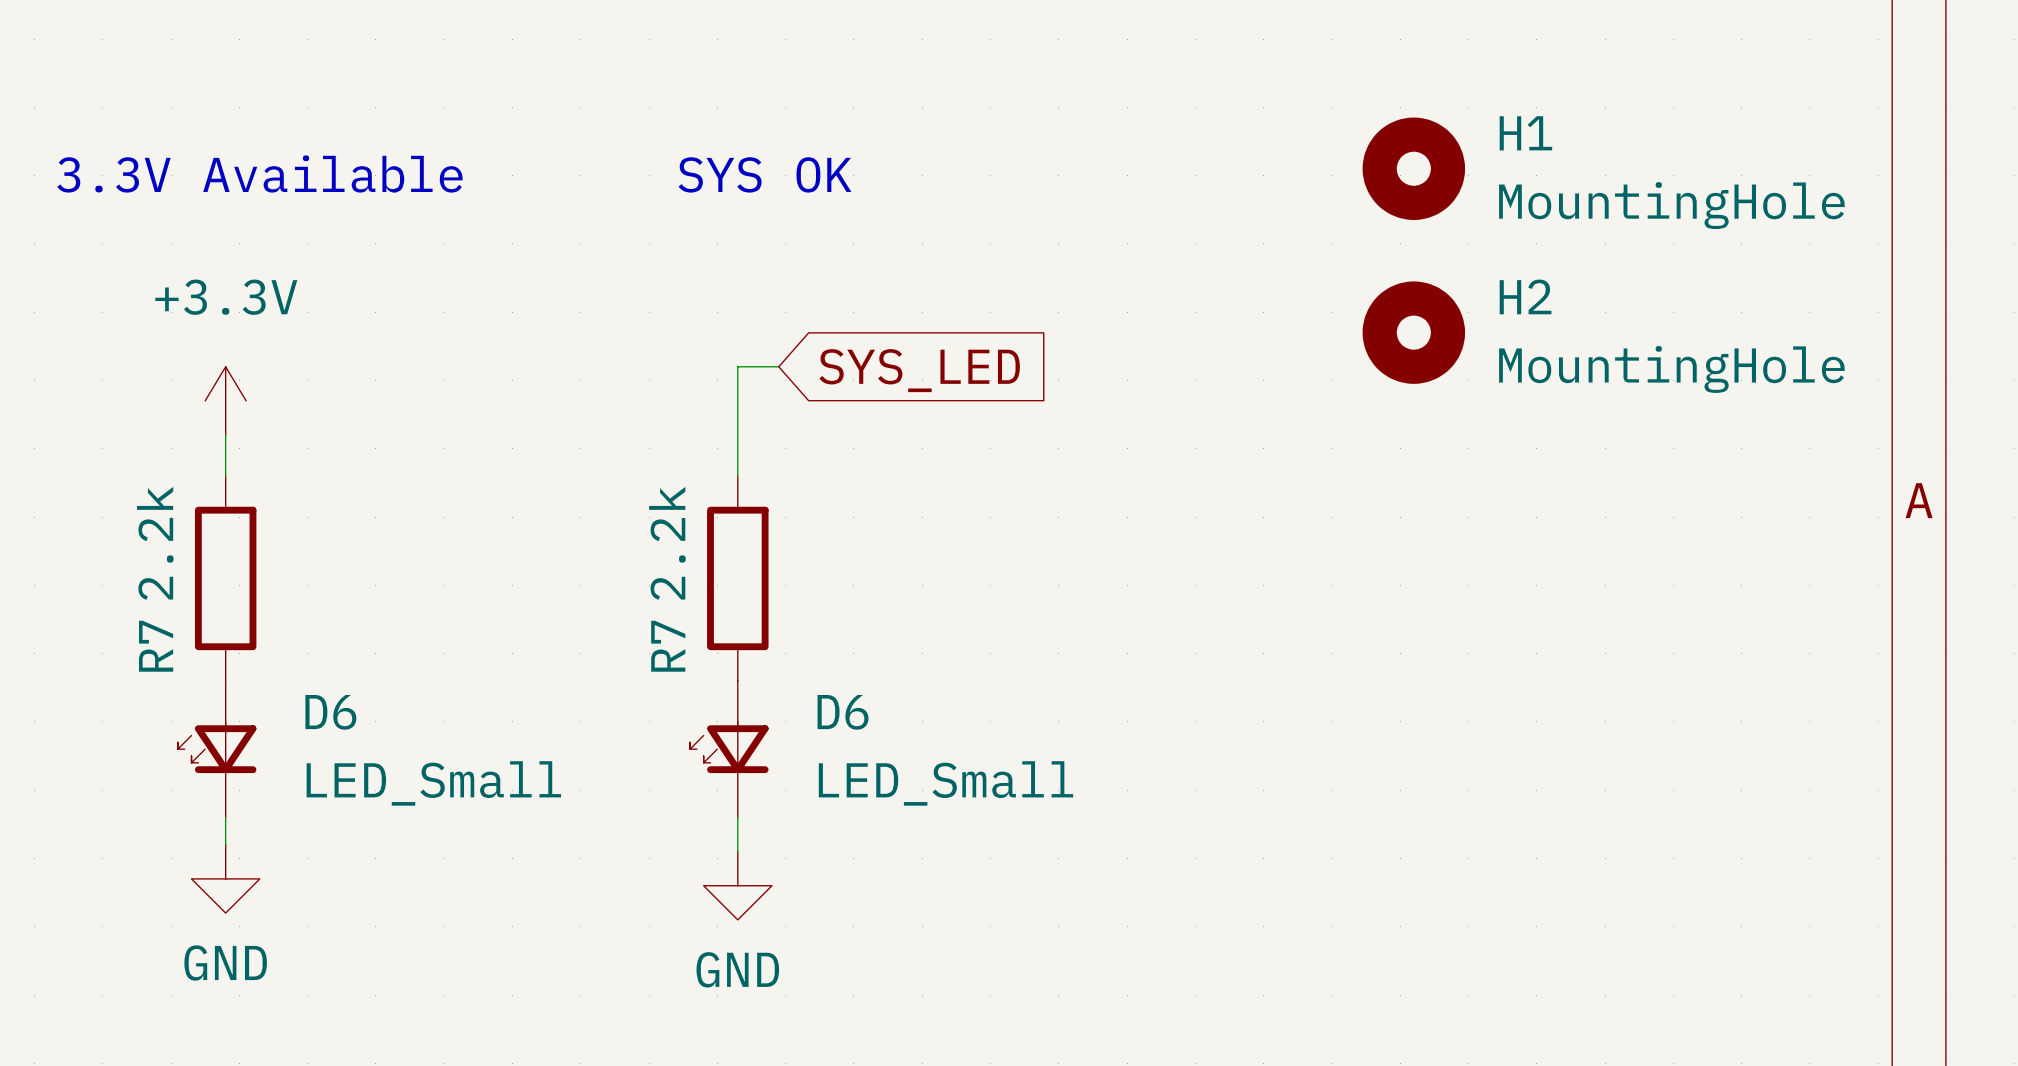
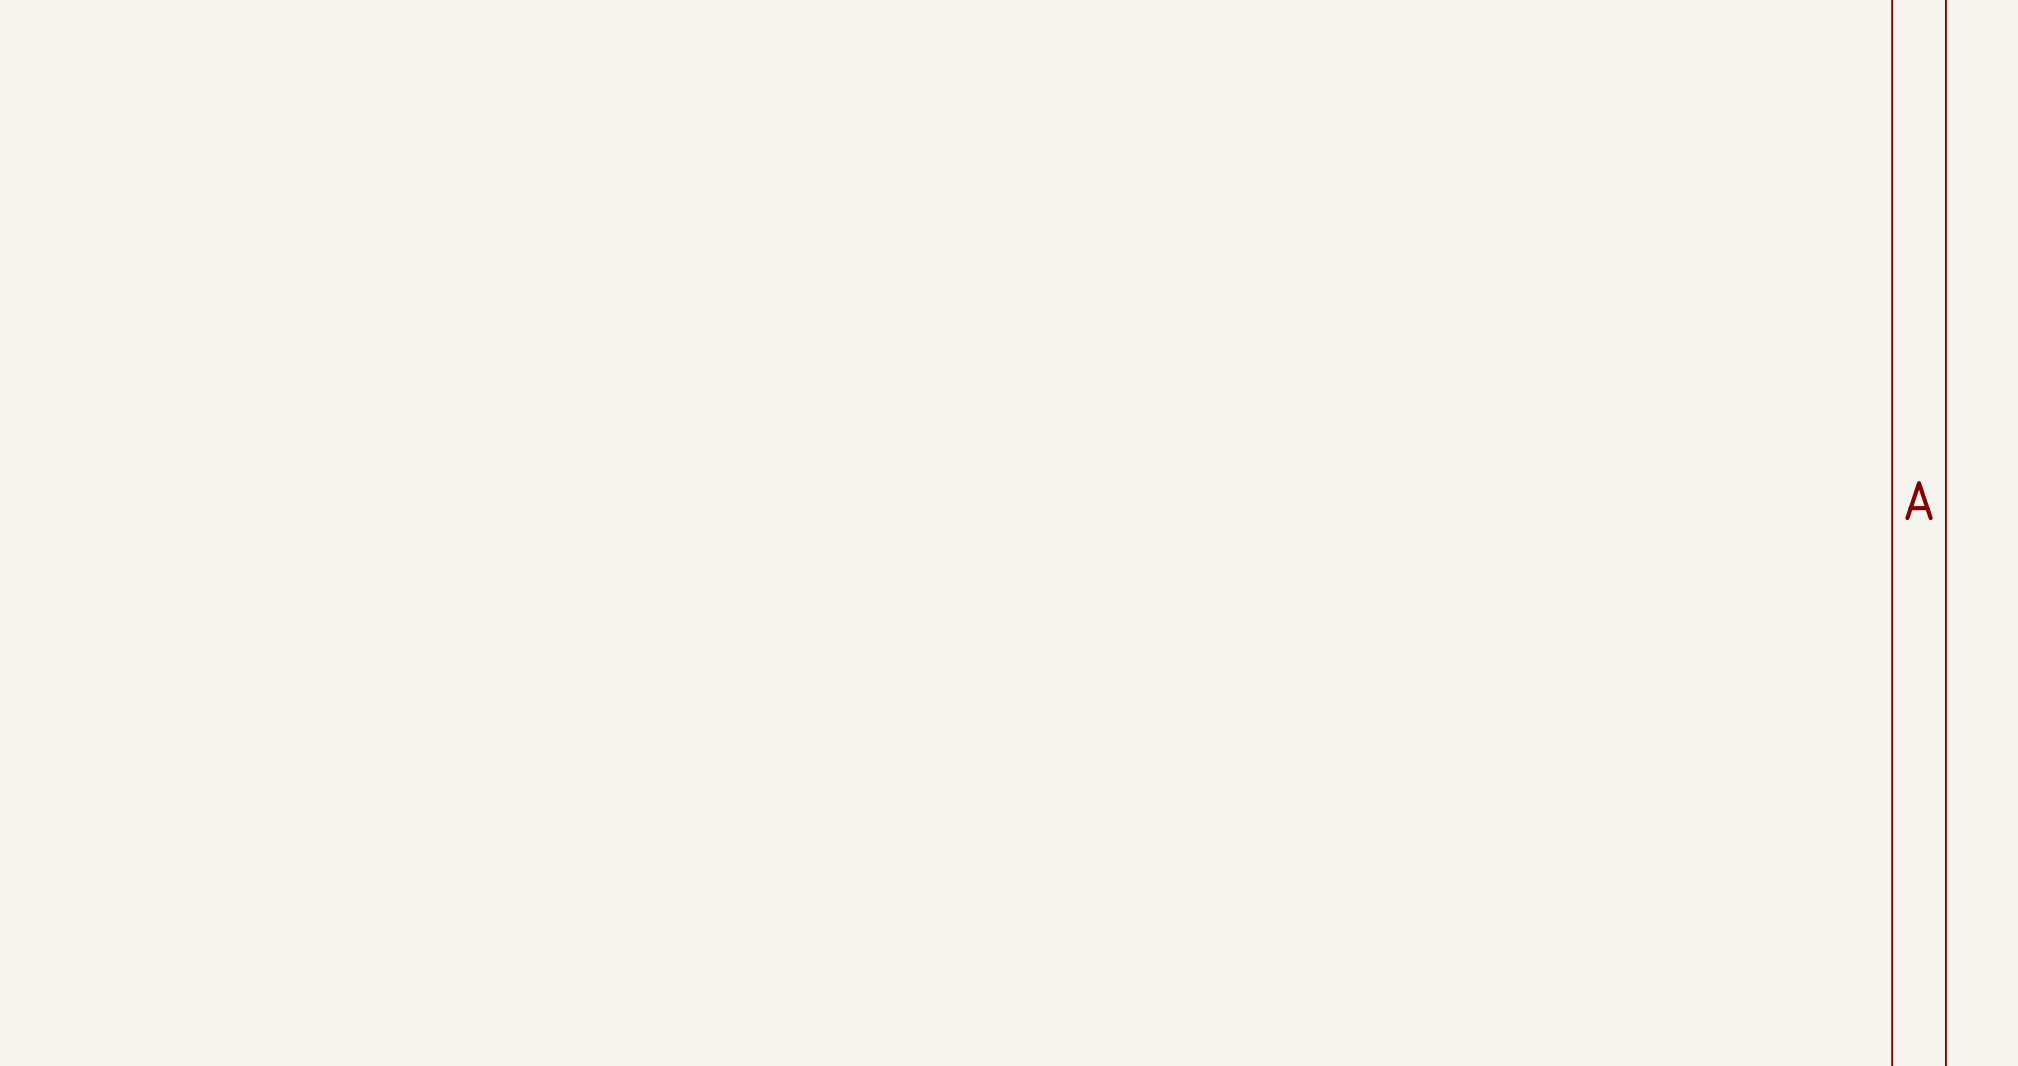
H1: MountingHole (1413, 168) -> none
text: 3.3V Available (259, 173) -> none
text: SYS OK (764, 174) -> none
H2: MountingHole (1413, 332) -> none
wire: (778, 366) (737, 366) (737, 476) -> none
global label: SYS_LED (919, 370) -> none
power symbol: +3.3V (225, 400) -> none
wire: (225, 435) (225, 476) -> none
R7: 2.2k (225, 578) -> none
R7: 2.2k (737, 578) -> none
D6: LED_Small (217, 749) -> none
D6: LED_Small (729, 749) -> none
wire: (225, 817) (225, 844) -> none
wire: (737, 817) (737, 851) -> none
power symbol: GND (225, 878) -> none
power symbol: GND (737, 885) -> none

